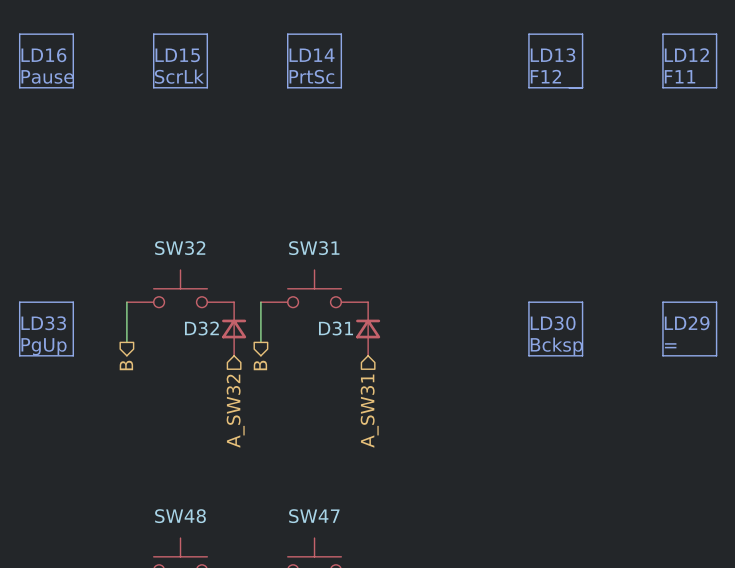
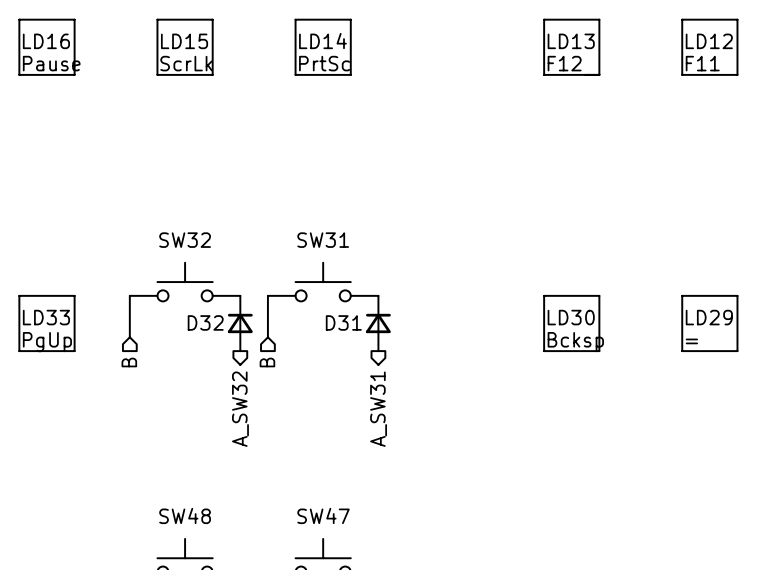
hierarchical label shape: output (126, 365) -> input (129, 362)
hierarchical label shape: output (260, 365) -> input (267, 362)
hierarchical label shape: input (235, 411) -> output (240, 409)
hierarchical label shape: input (369, 411) -> output (378, 409)

